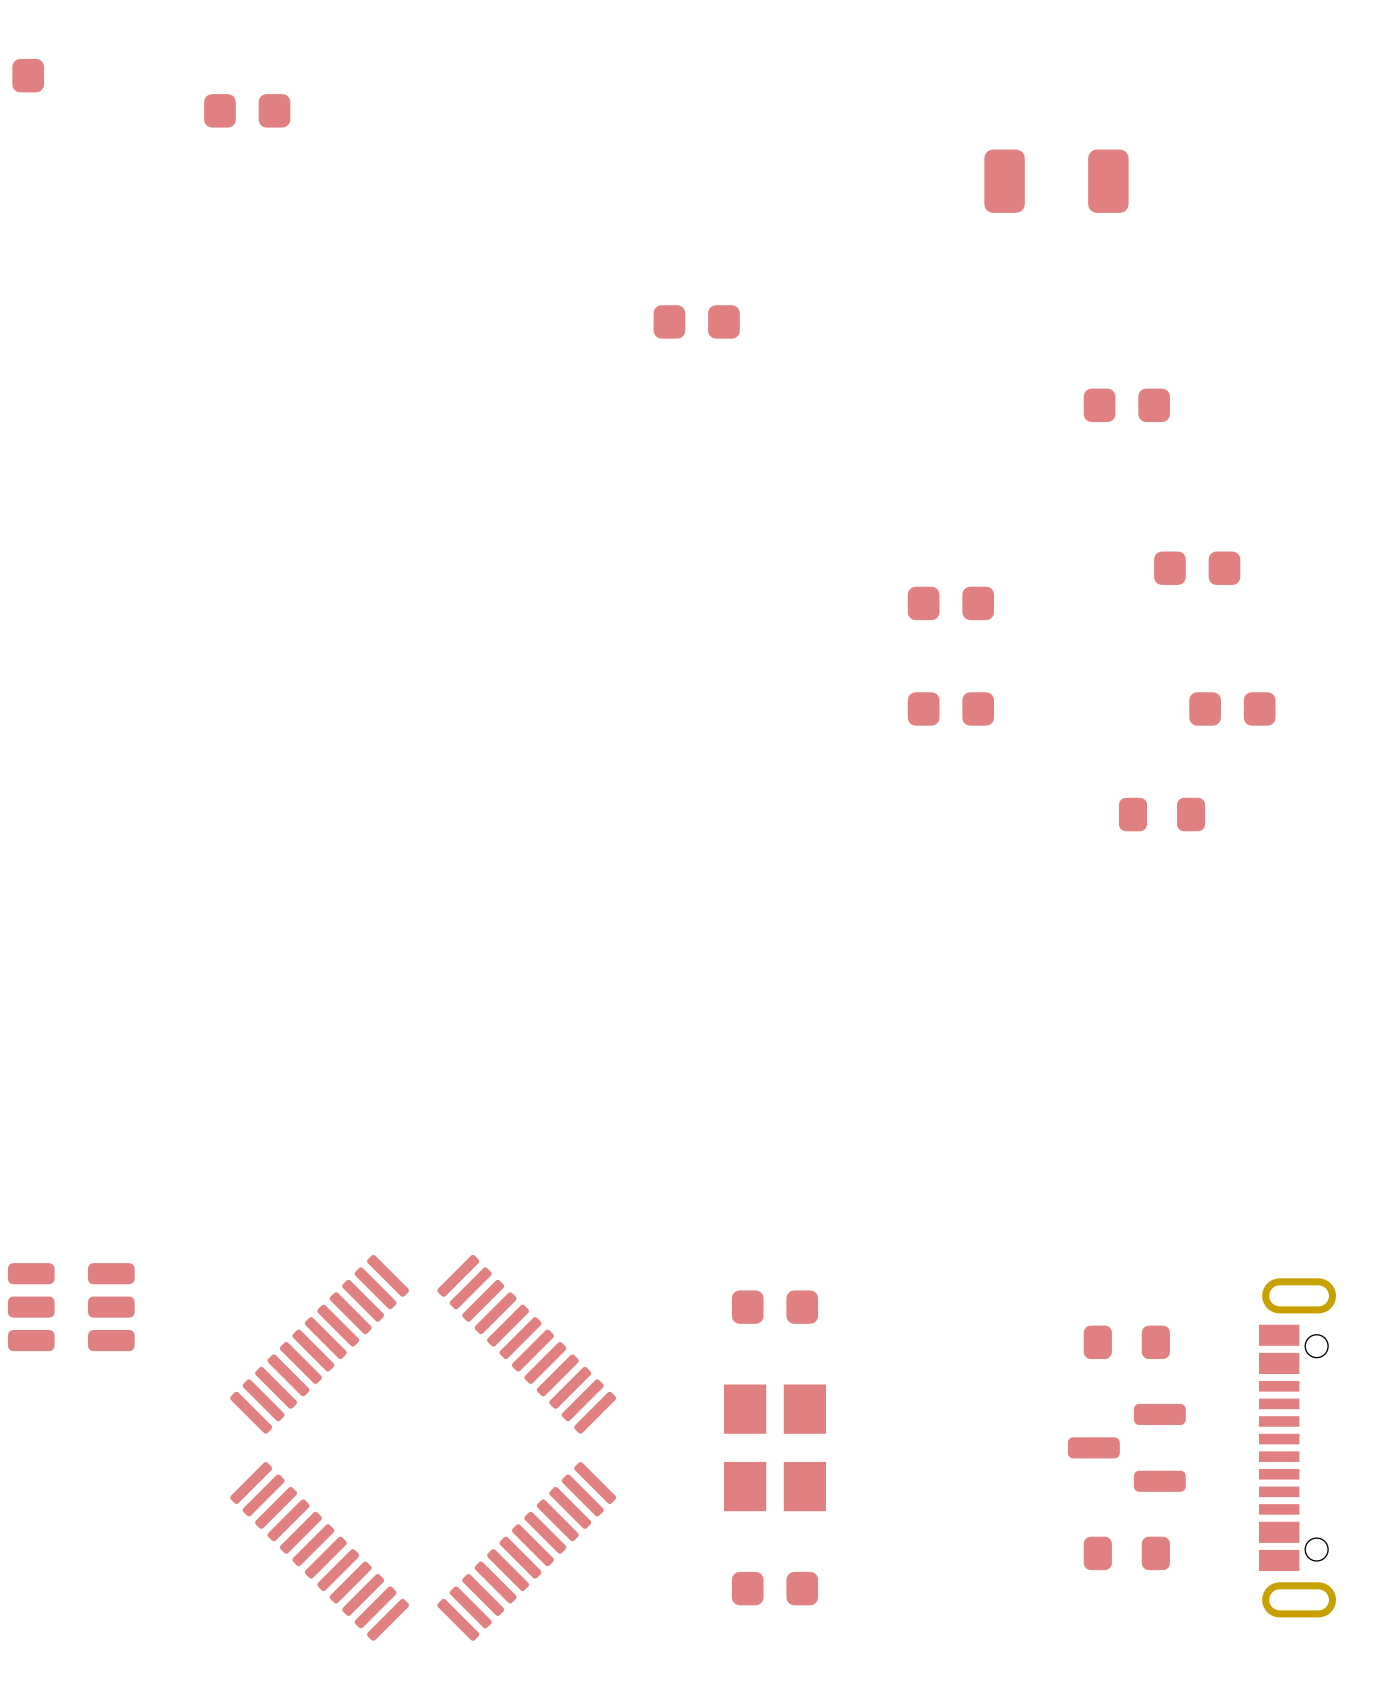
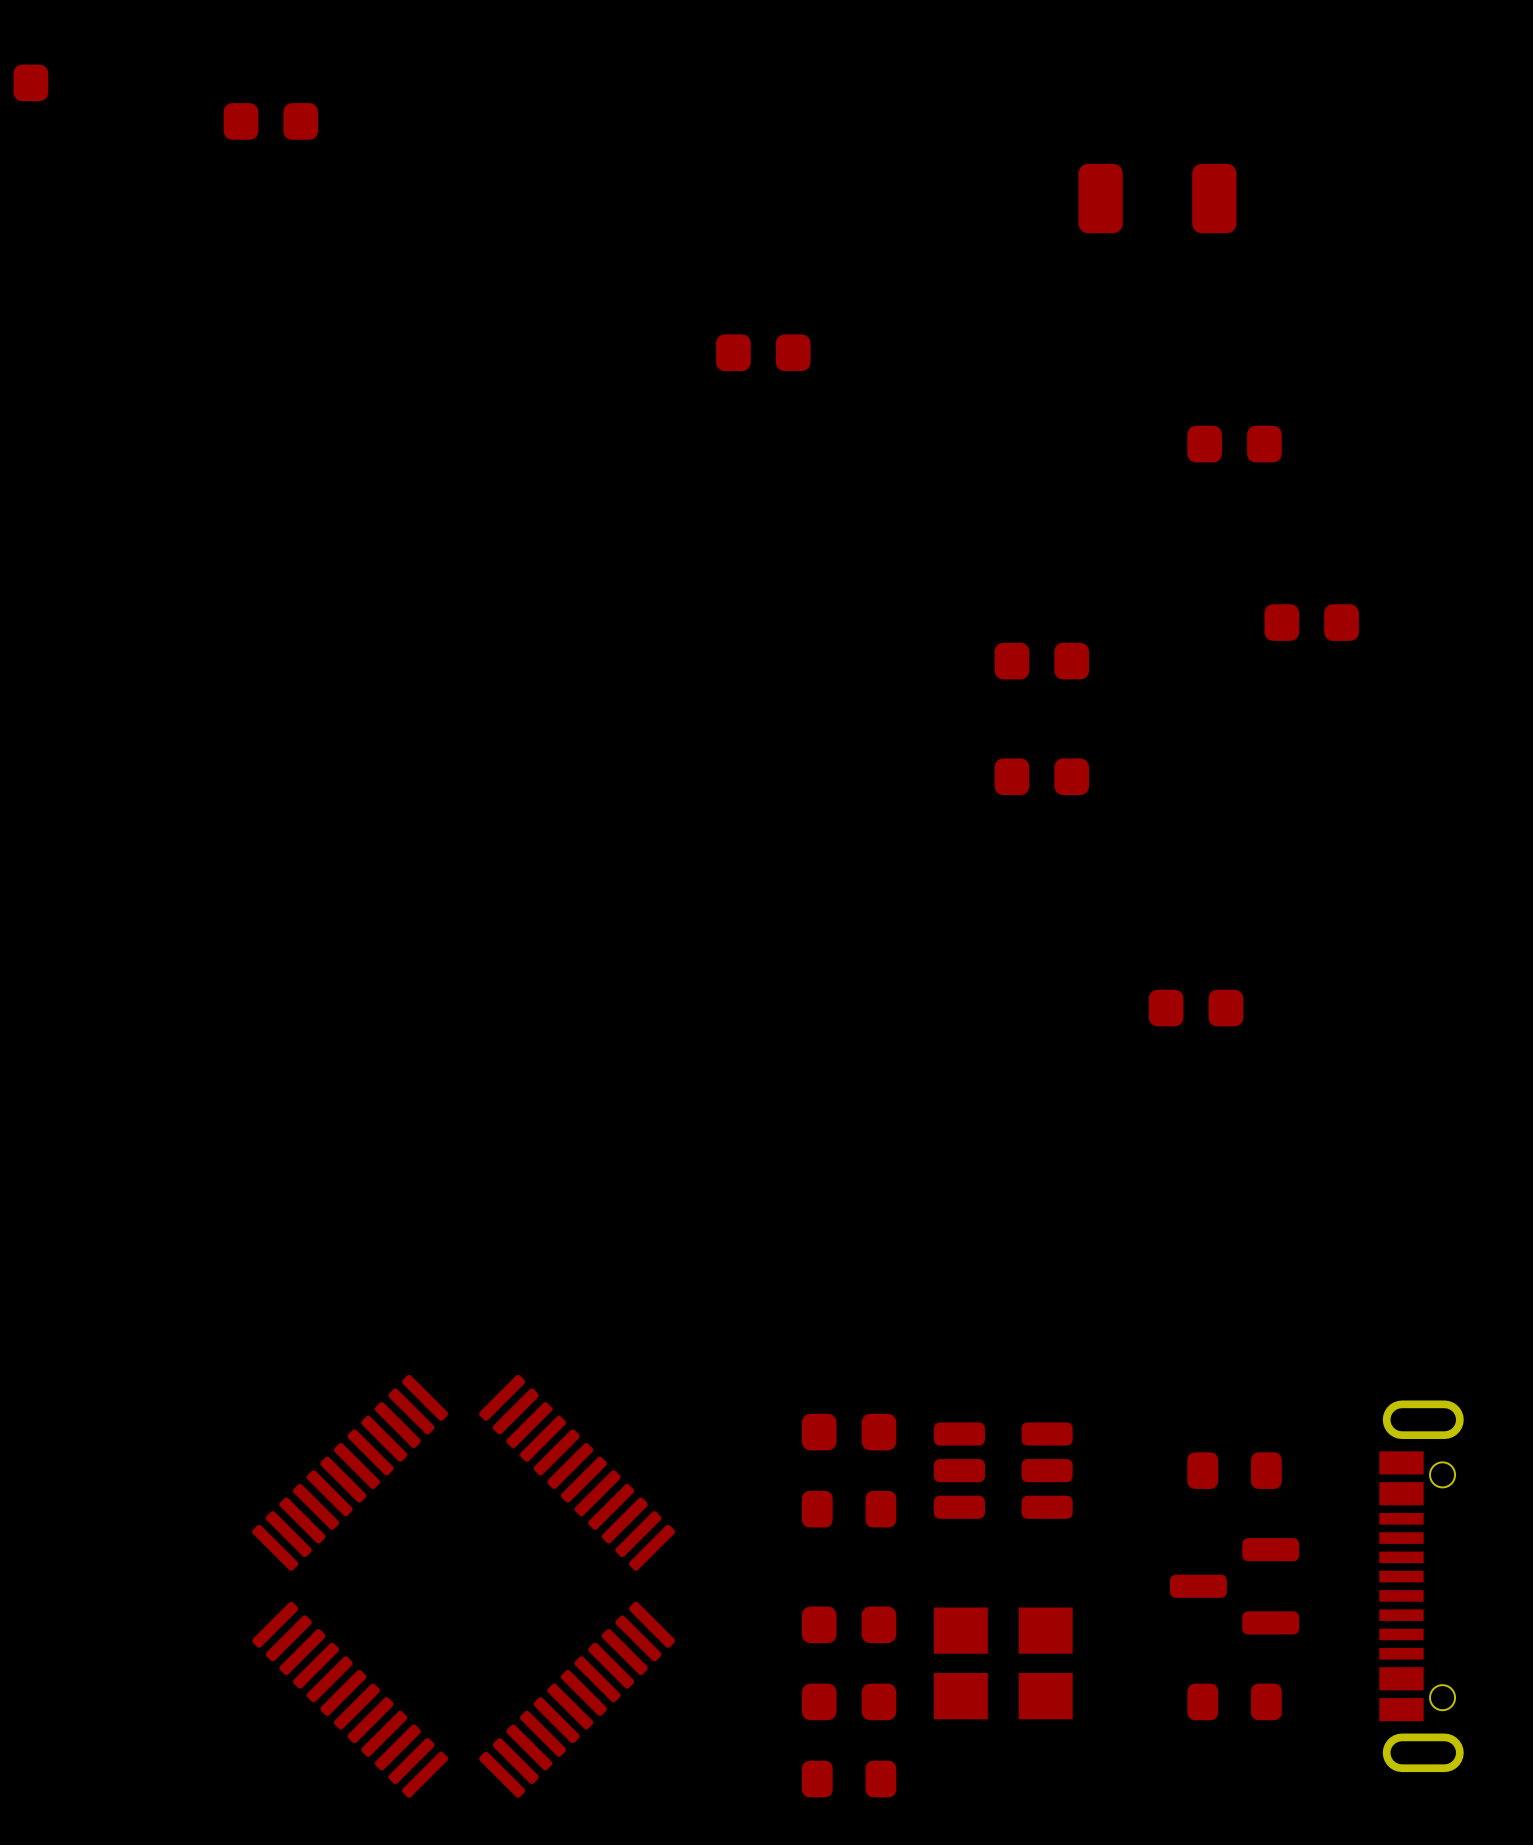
part position: (1232, 708) -> (1196, 1008)
part: (1162, 814) -> none
part position: (71, 1307) -> (1003, 1470)
part: none -> (849, 1509)
part rotation: 0° (774, 1447) -> 90° clockwise (1003, 1663)
part position: (774, 1447) -> (1003, 1663)
part: none -> (849, 1624)
part position: (774, 1588) -> (849, 1701)
part: none -> (849, 1779)

